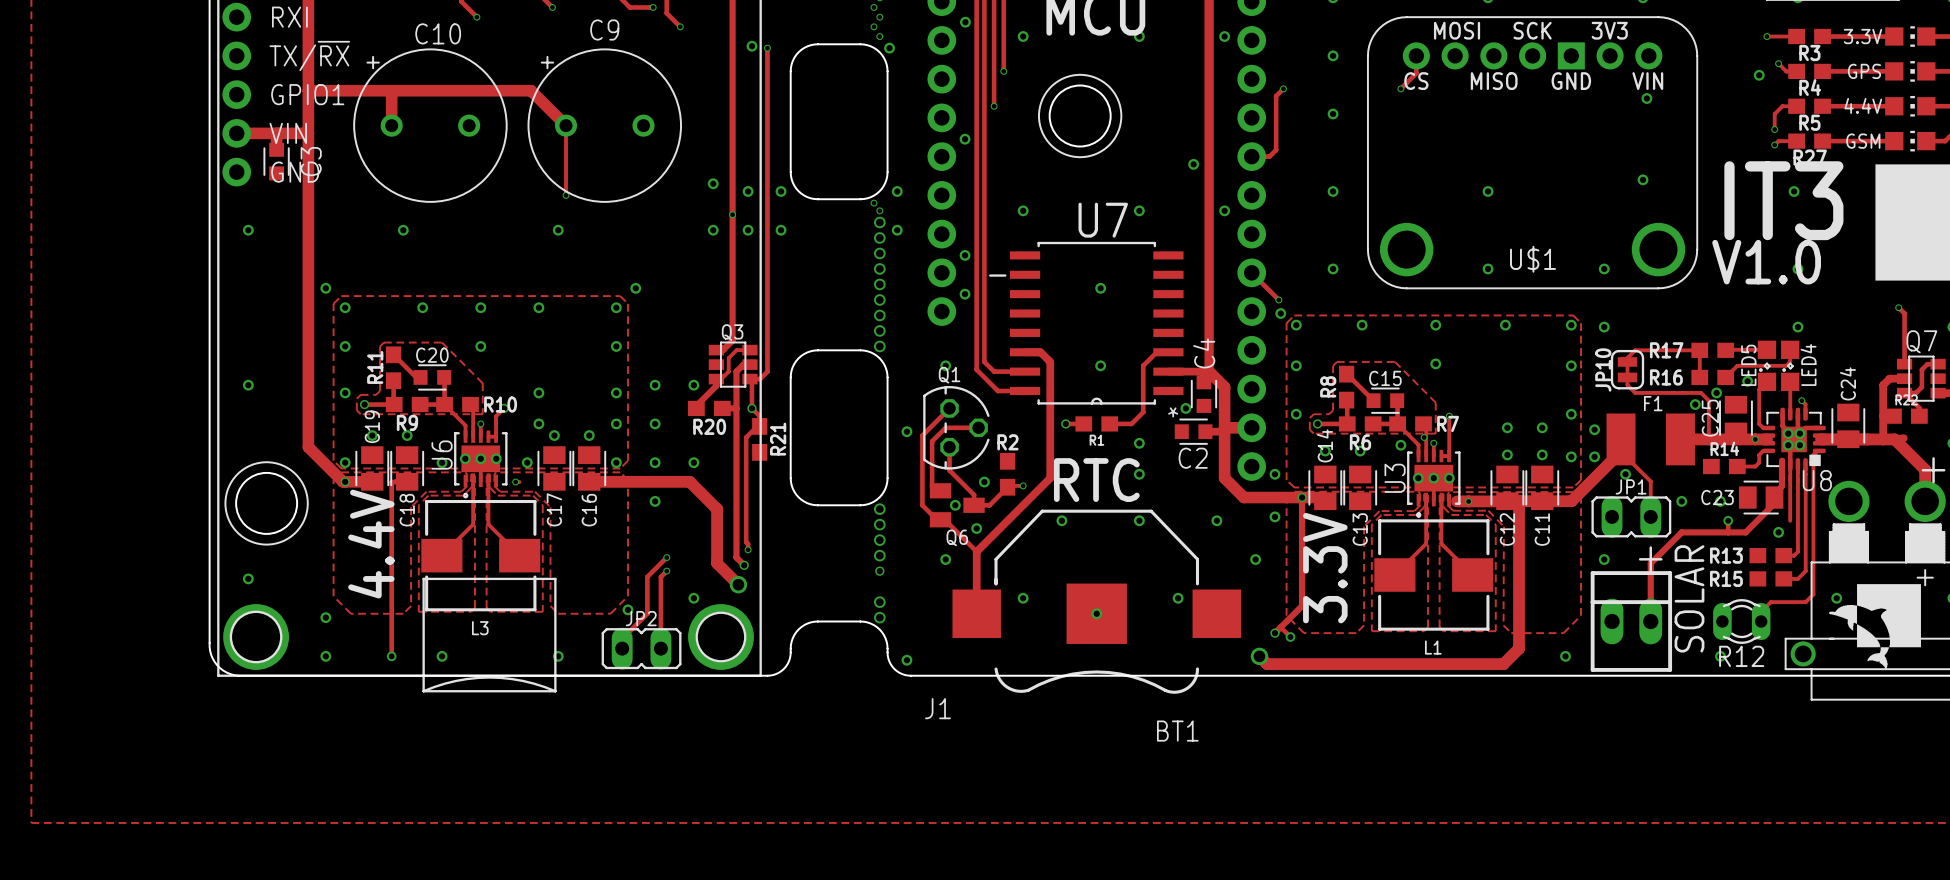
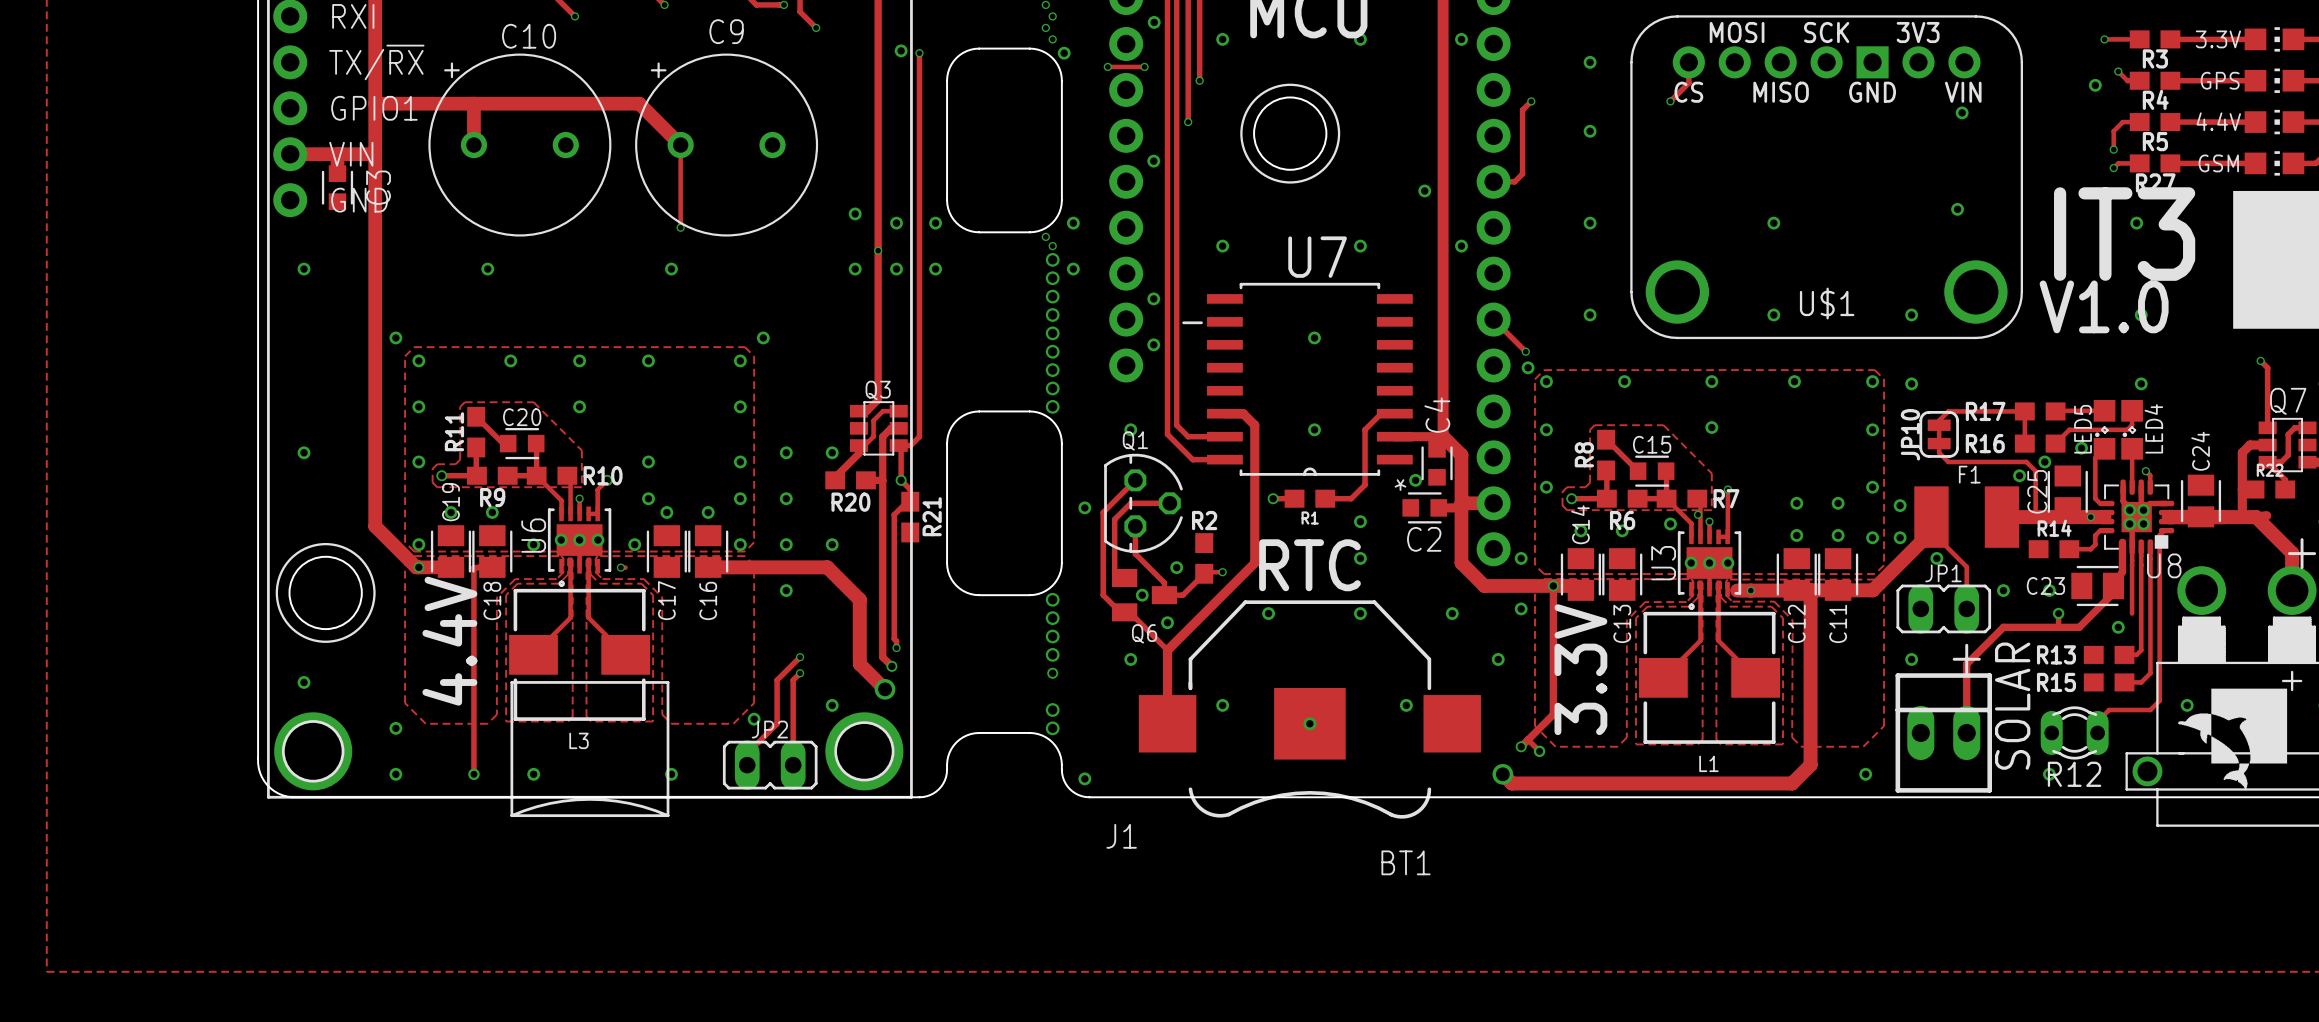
track: none -> (1107, 66) (1144, 66)
via: none -> (1107, 66)
via: none -> (1144, 66)

